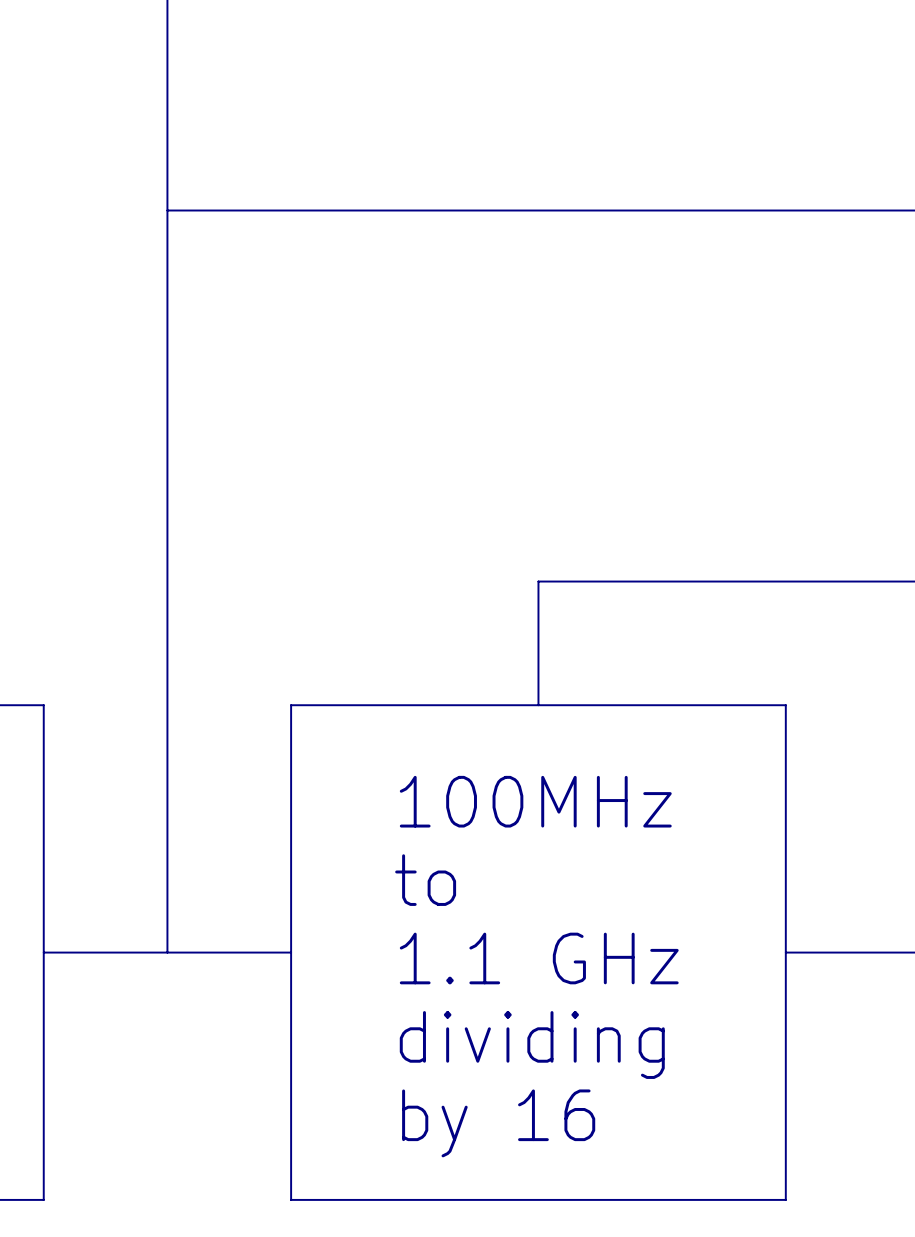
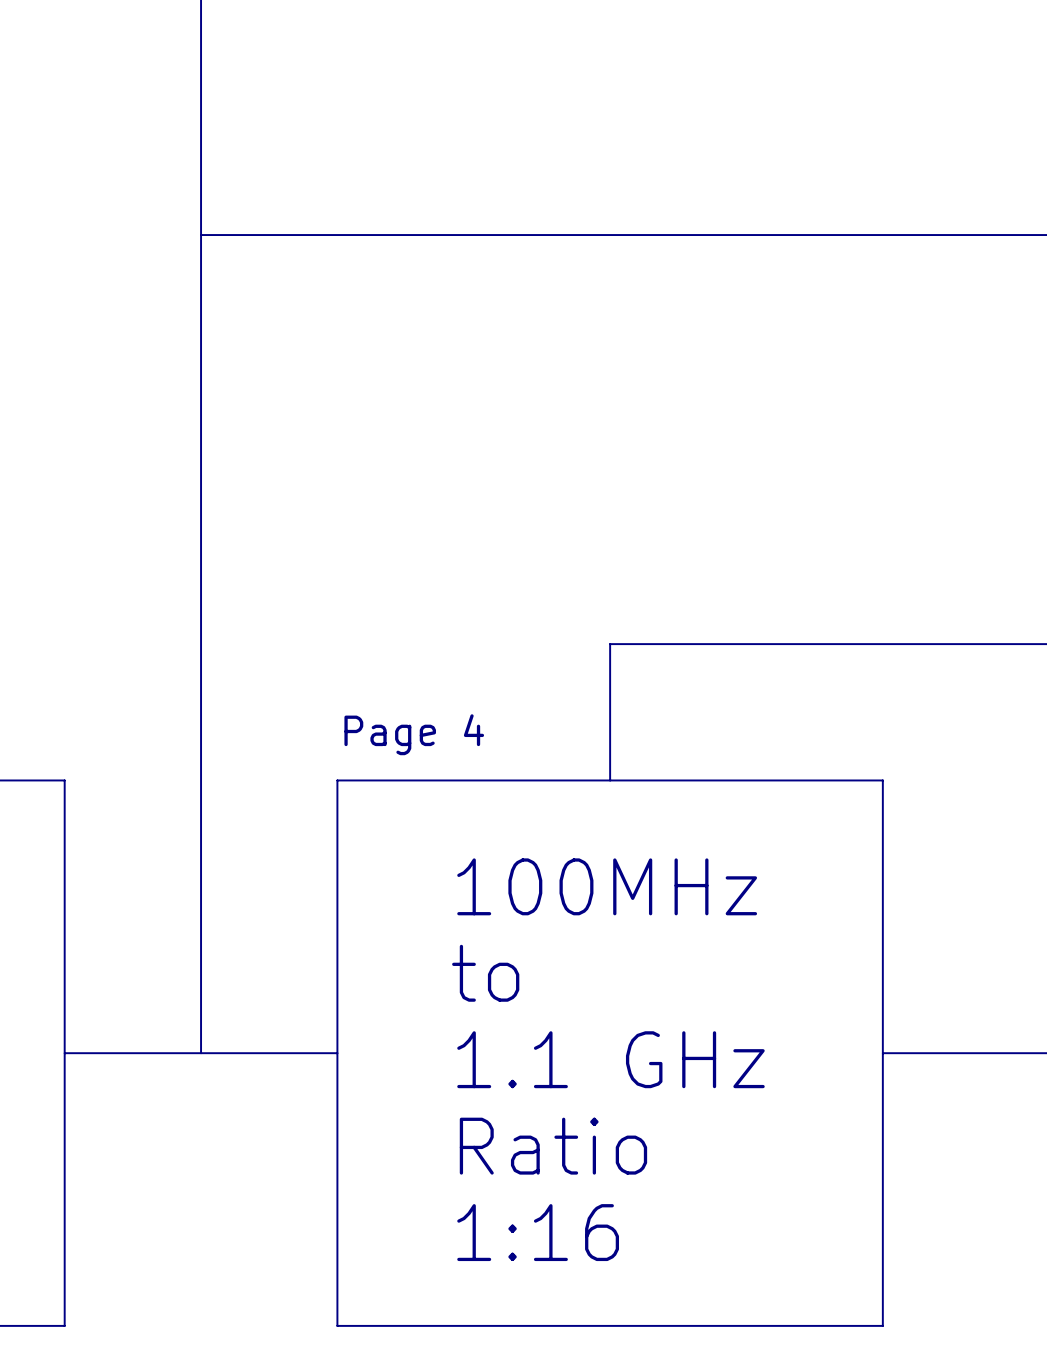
text: none -> Page 4 (414, 734)
text: dividing (532, 1045) -> Ratio (553, 1146)
text: by 16 (498, 1123) -> 1:16 (538, 1232)

